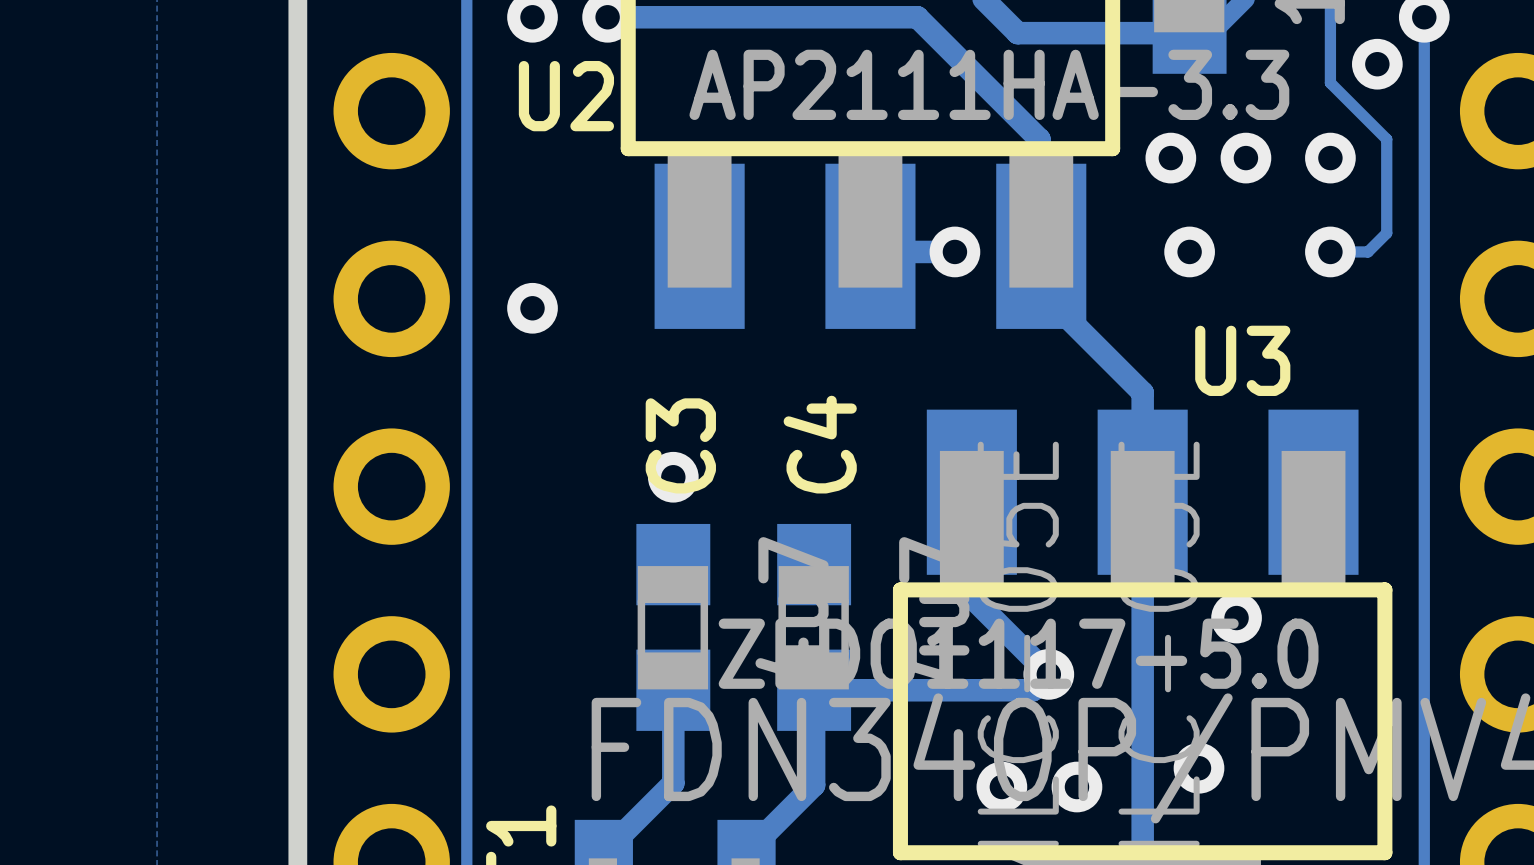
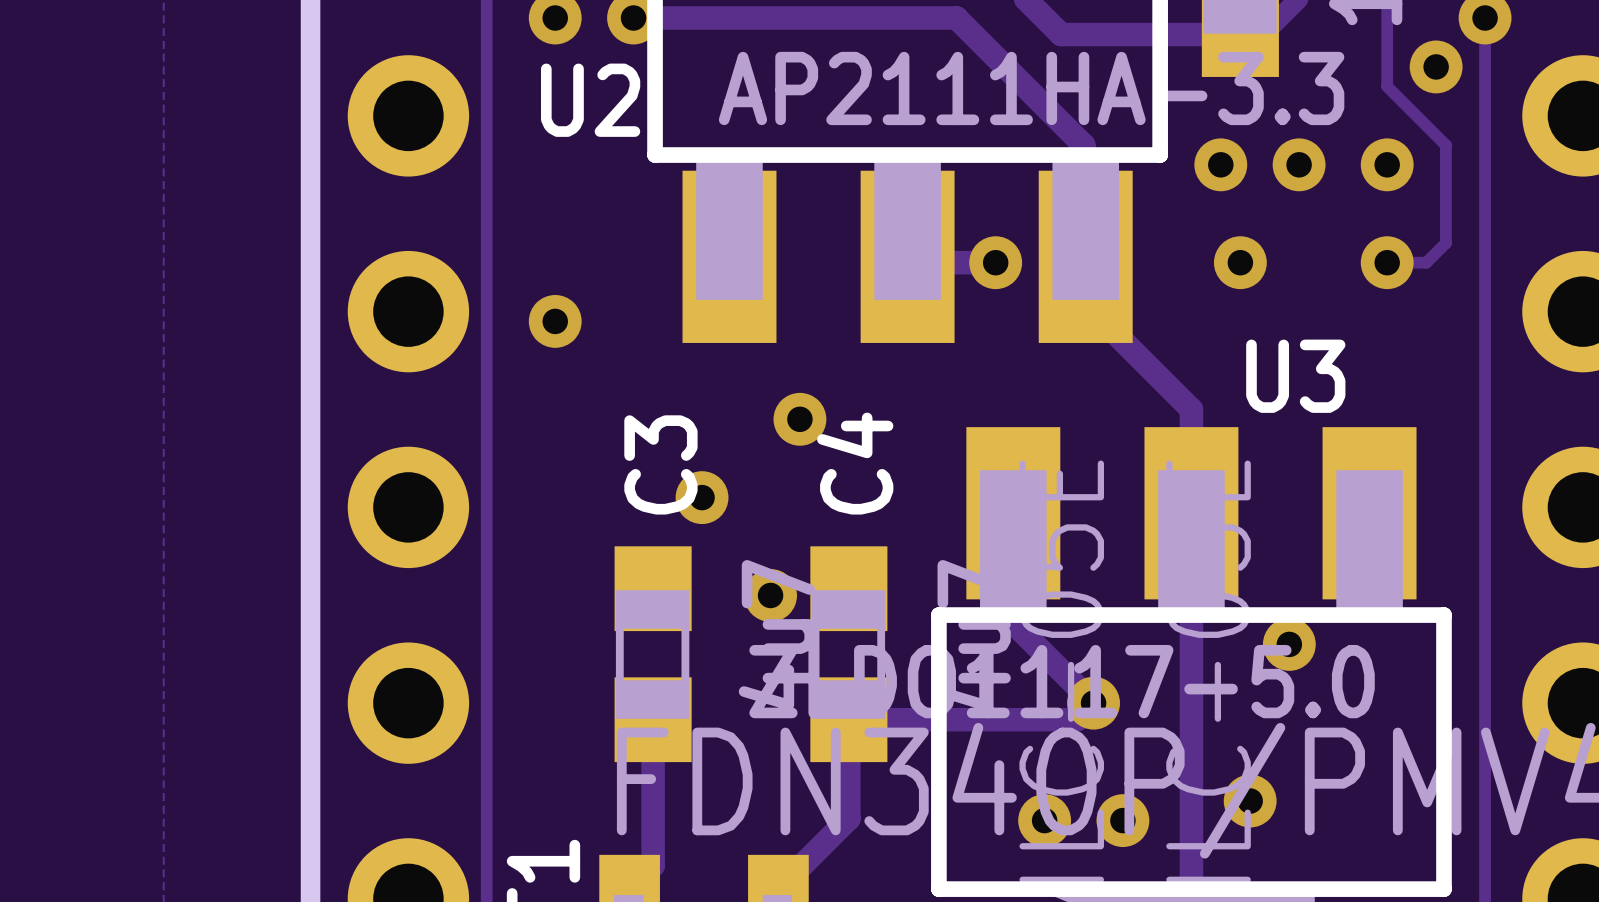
via: none -> (799, 419)
via: none -> (770, 595)
C3 position: (673, 627) -> (653, 654)
track: (673, 690) (673, 783) (626, 830) -> (653, 719) (653, 865)

